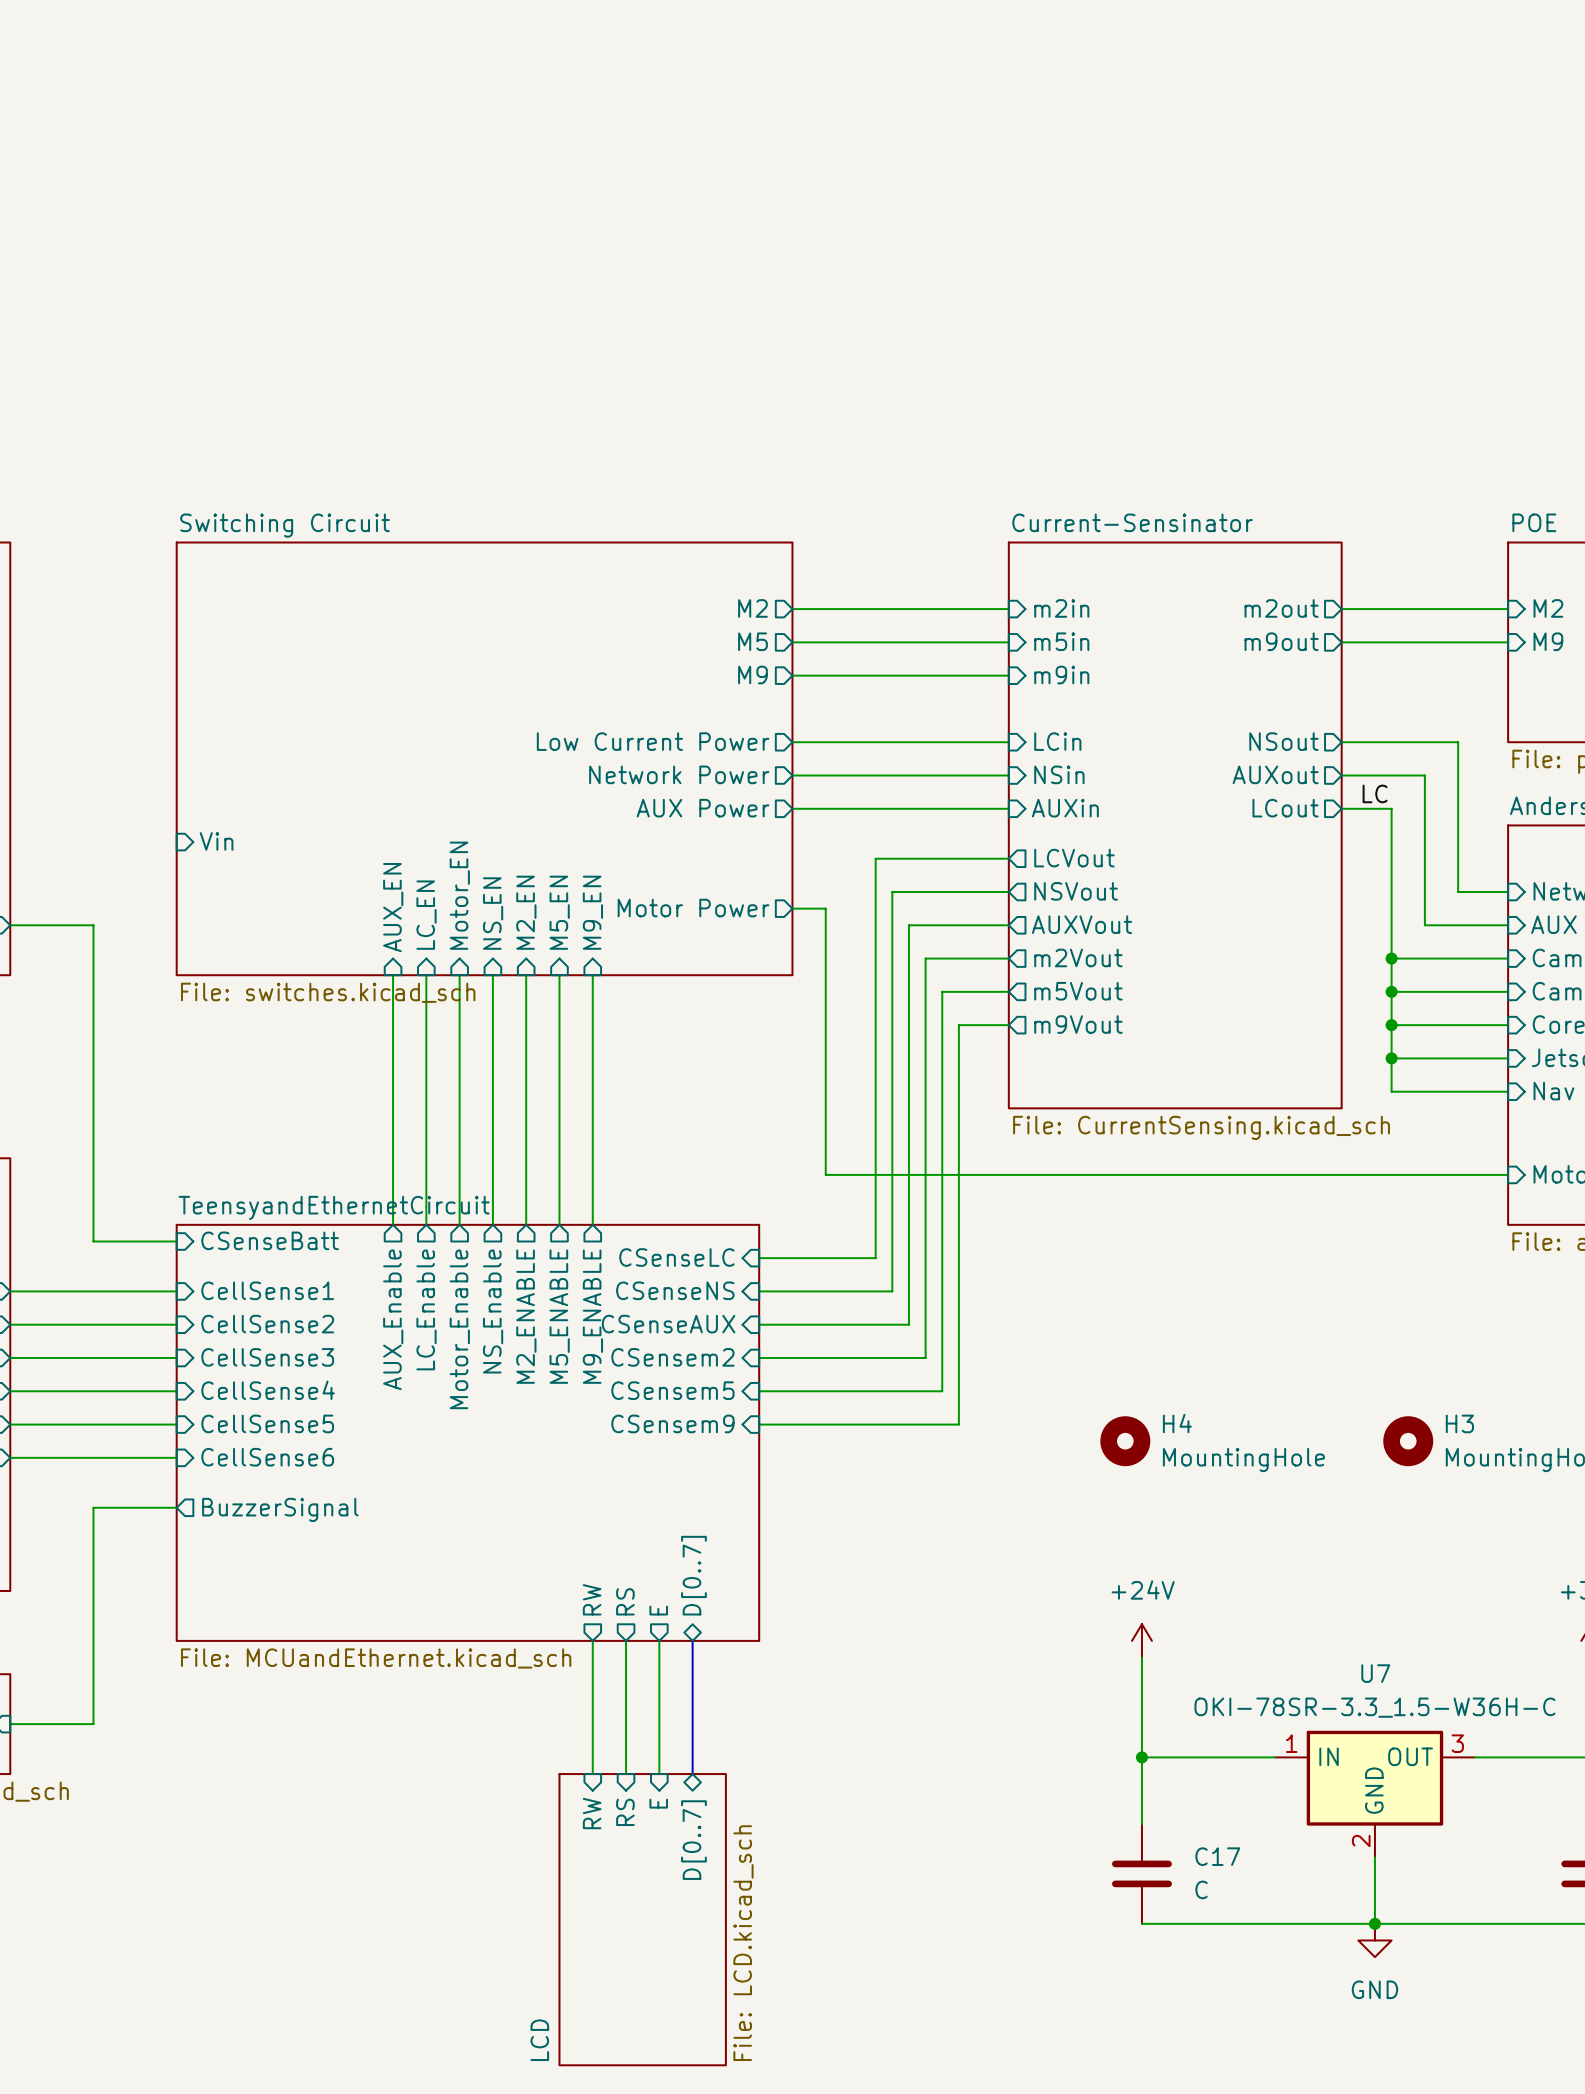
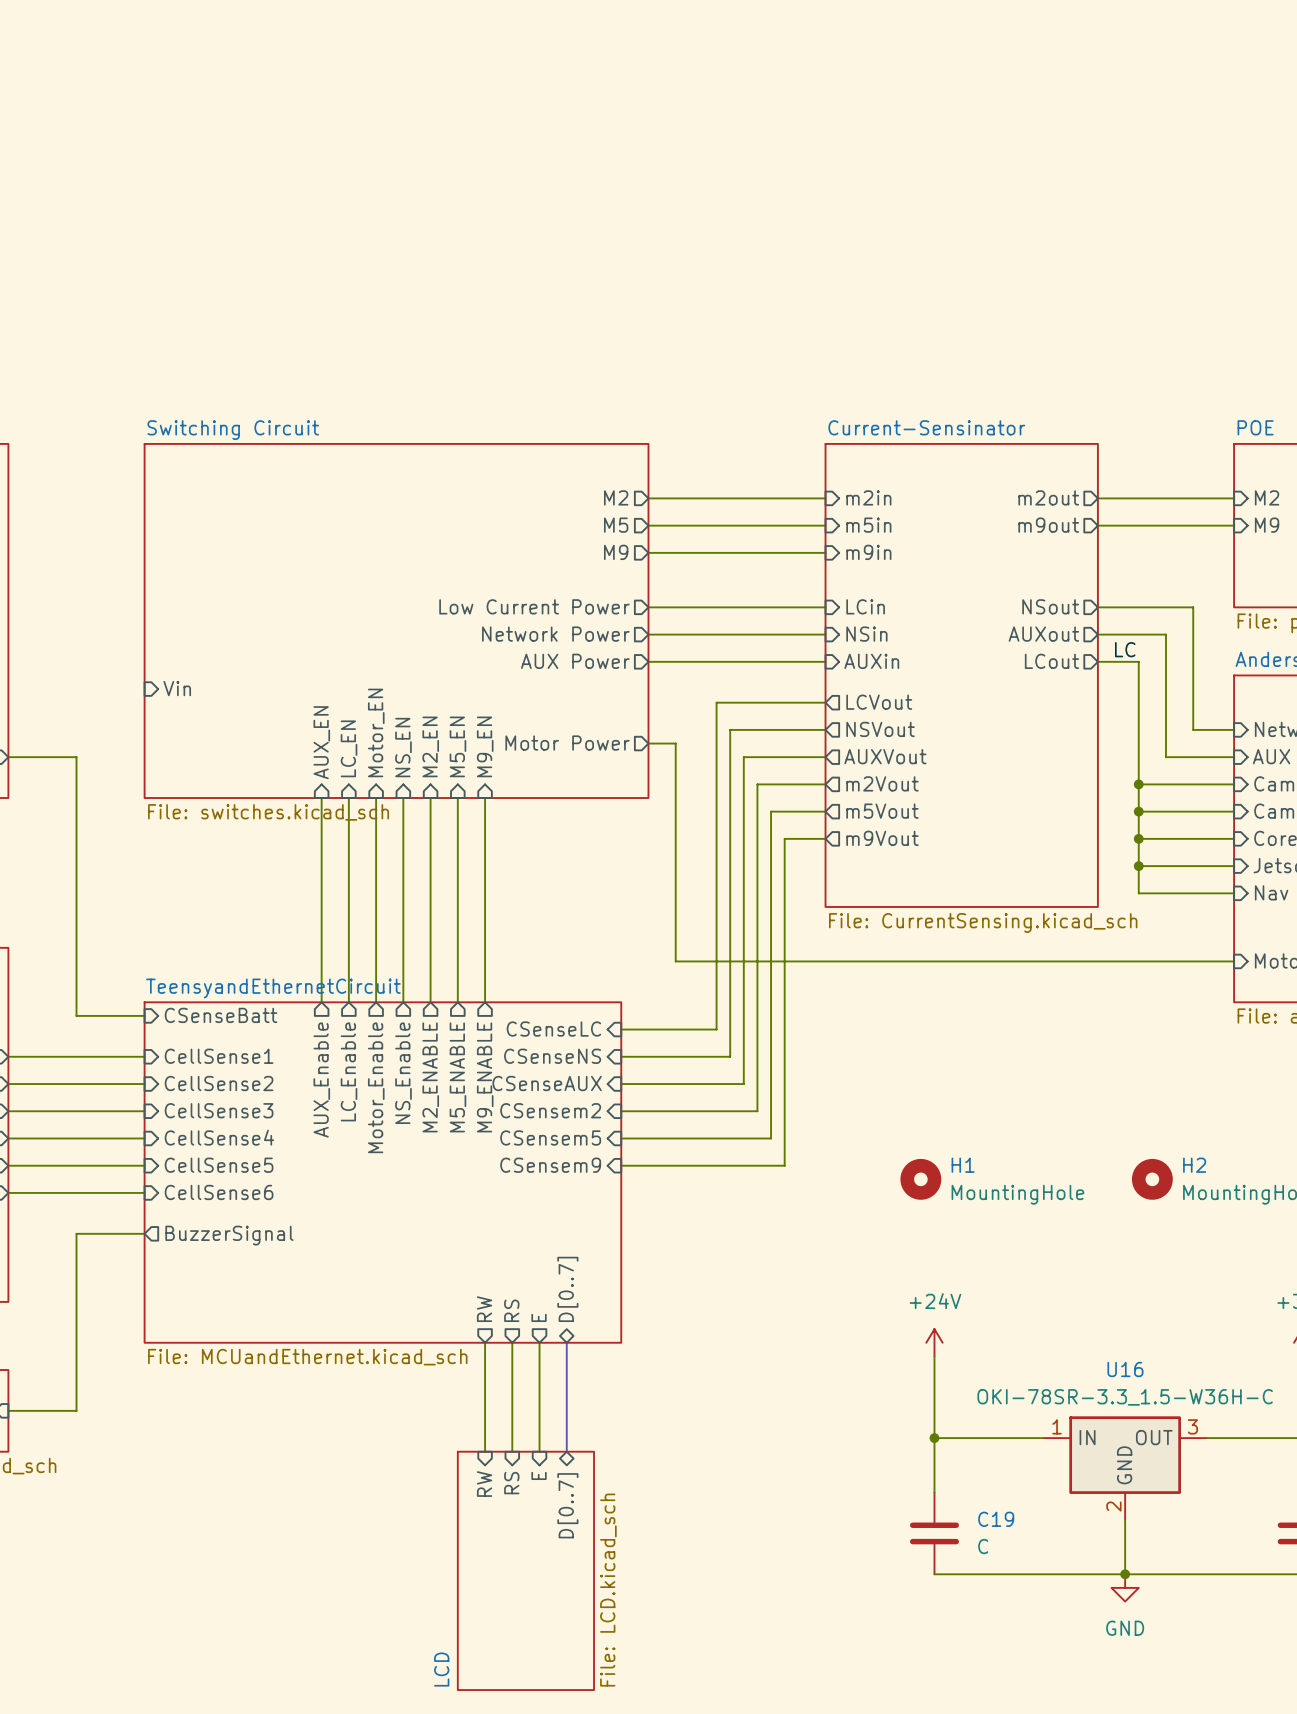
H4 name: H4 (1177, 1423) -> H1 (963, 1165)
H3 name: H3 (1459, 1423) -> H2 (1194, 1165)
U7 name: U7 (1375, 1673) -> U16 (1125, 1369)
C17 name: C17 (1217, 1856) -> C19 (996, 1519)

